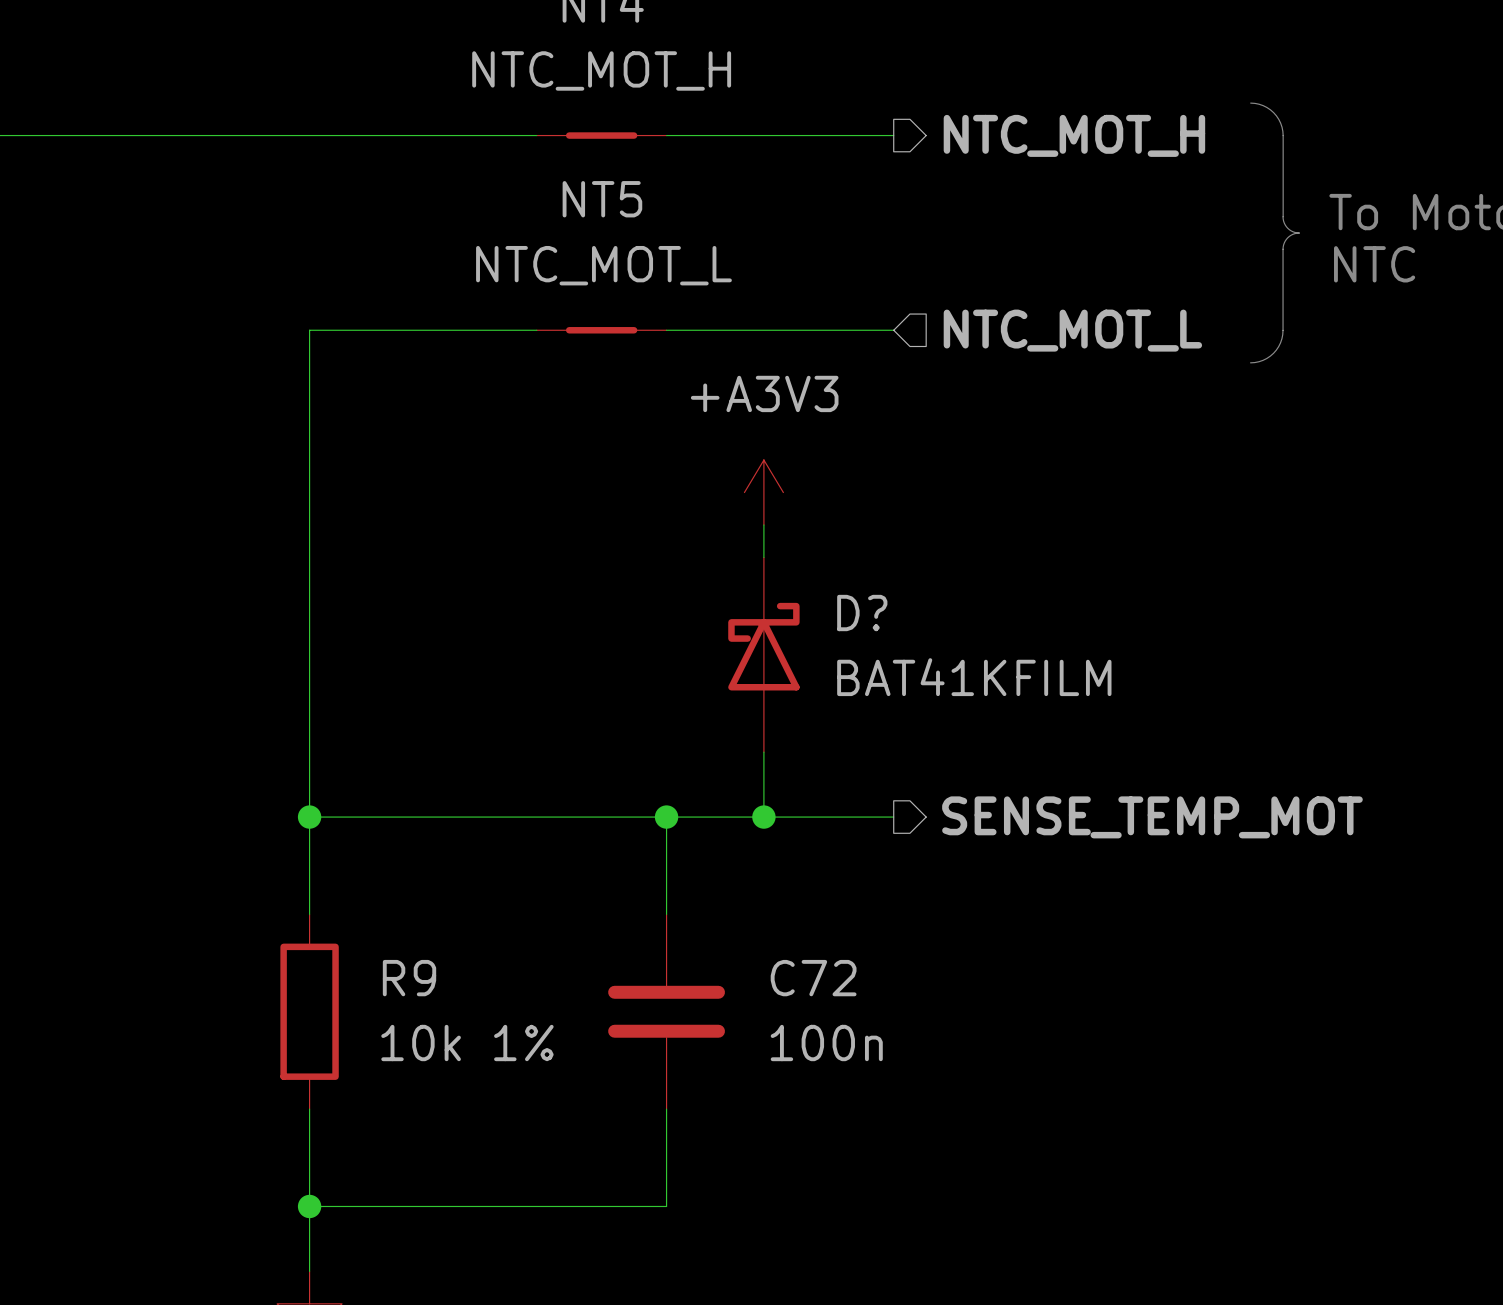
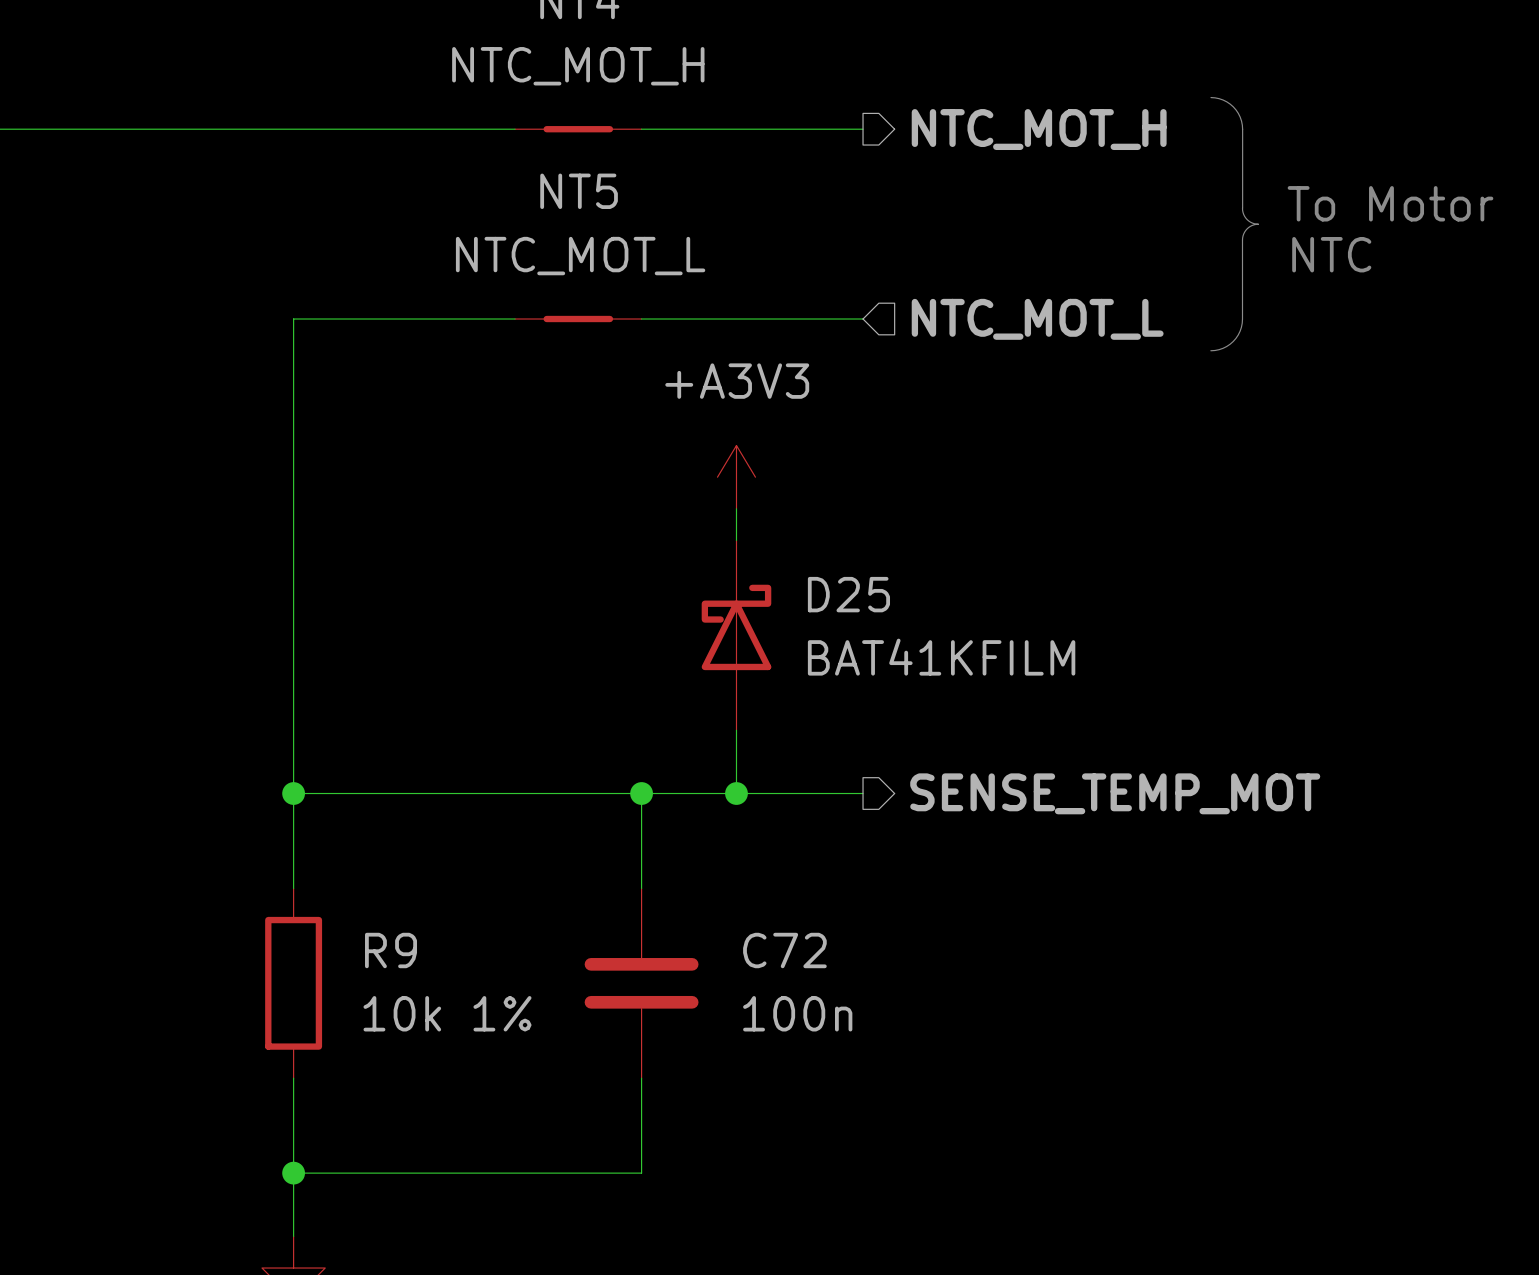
D? name: D? (862, 613) -> D25 (848, 594)

